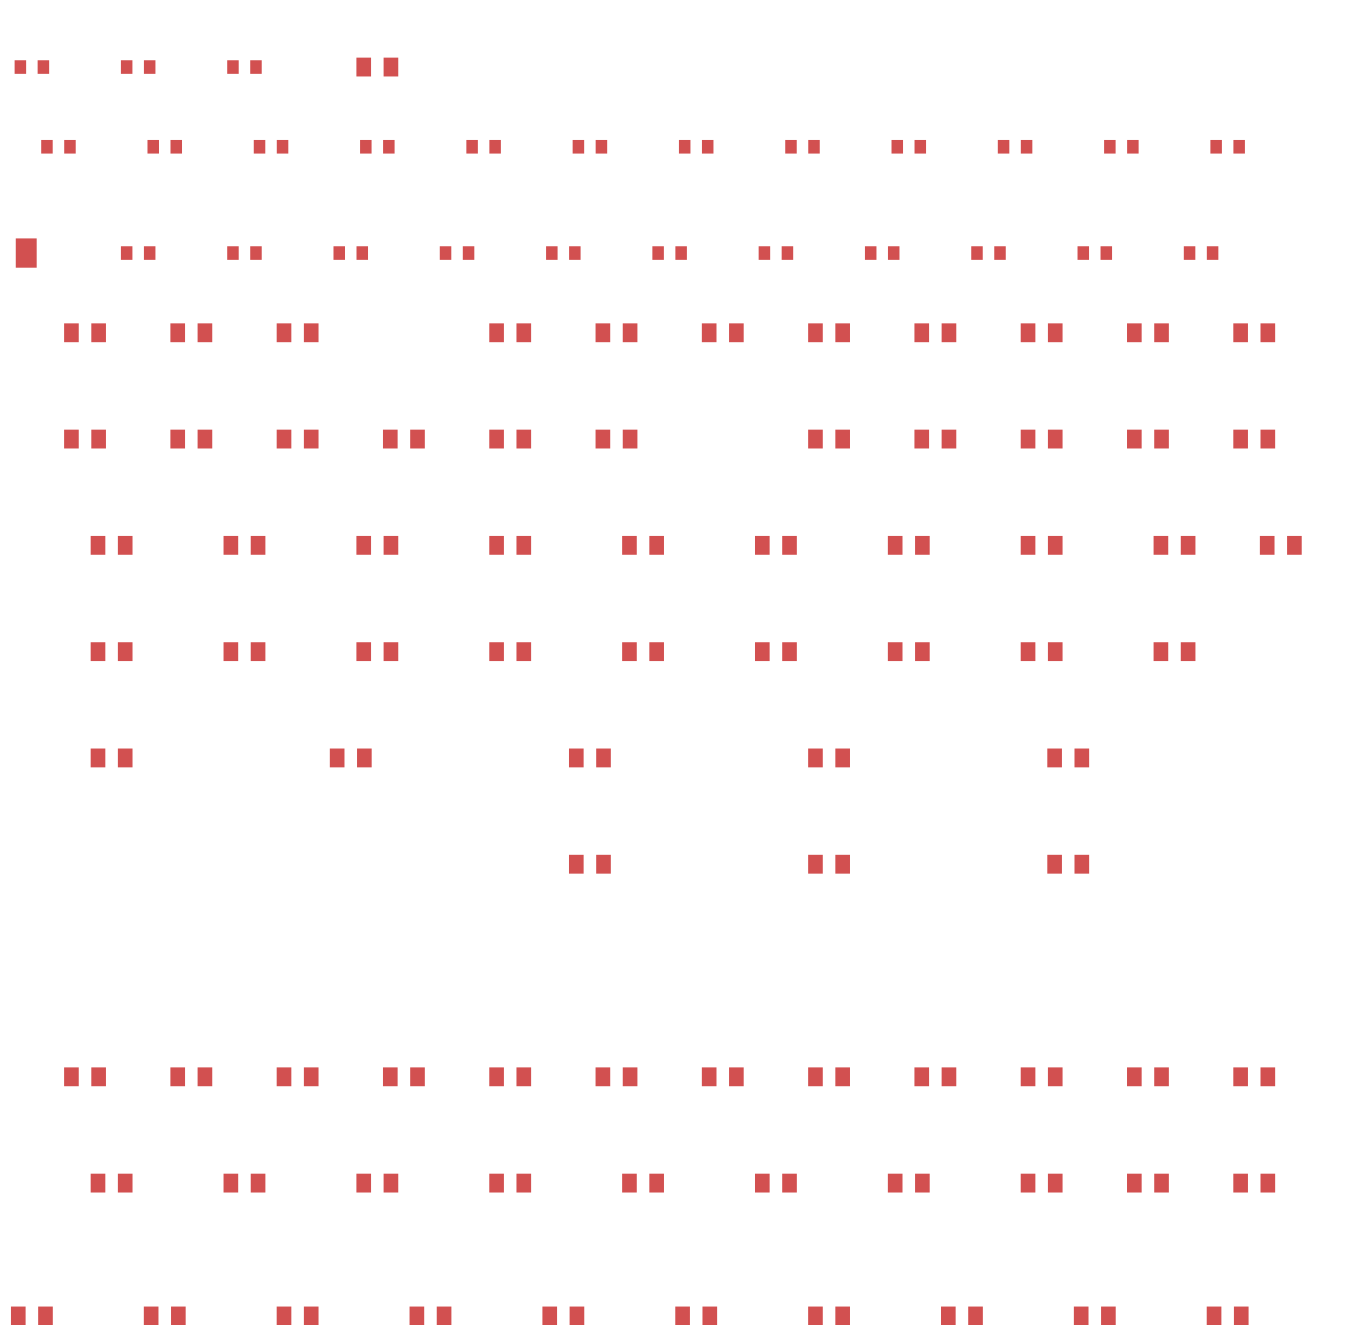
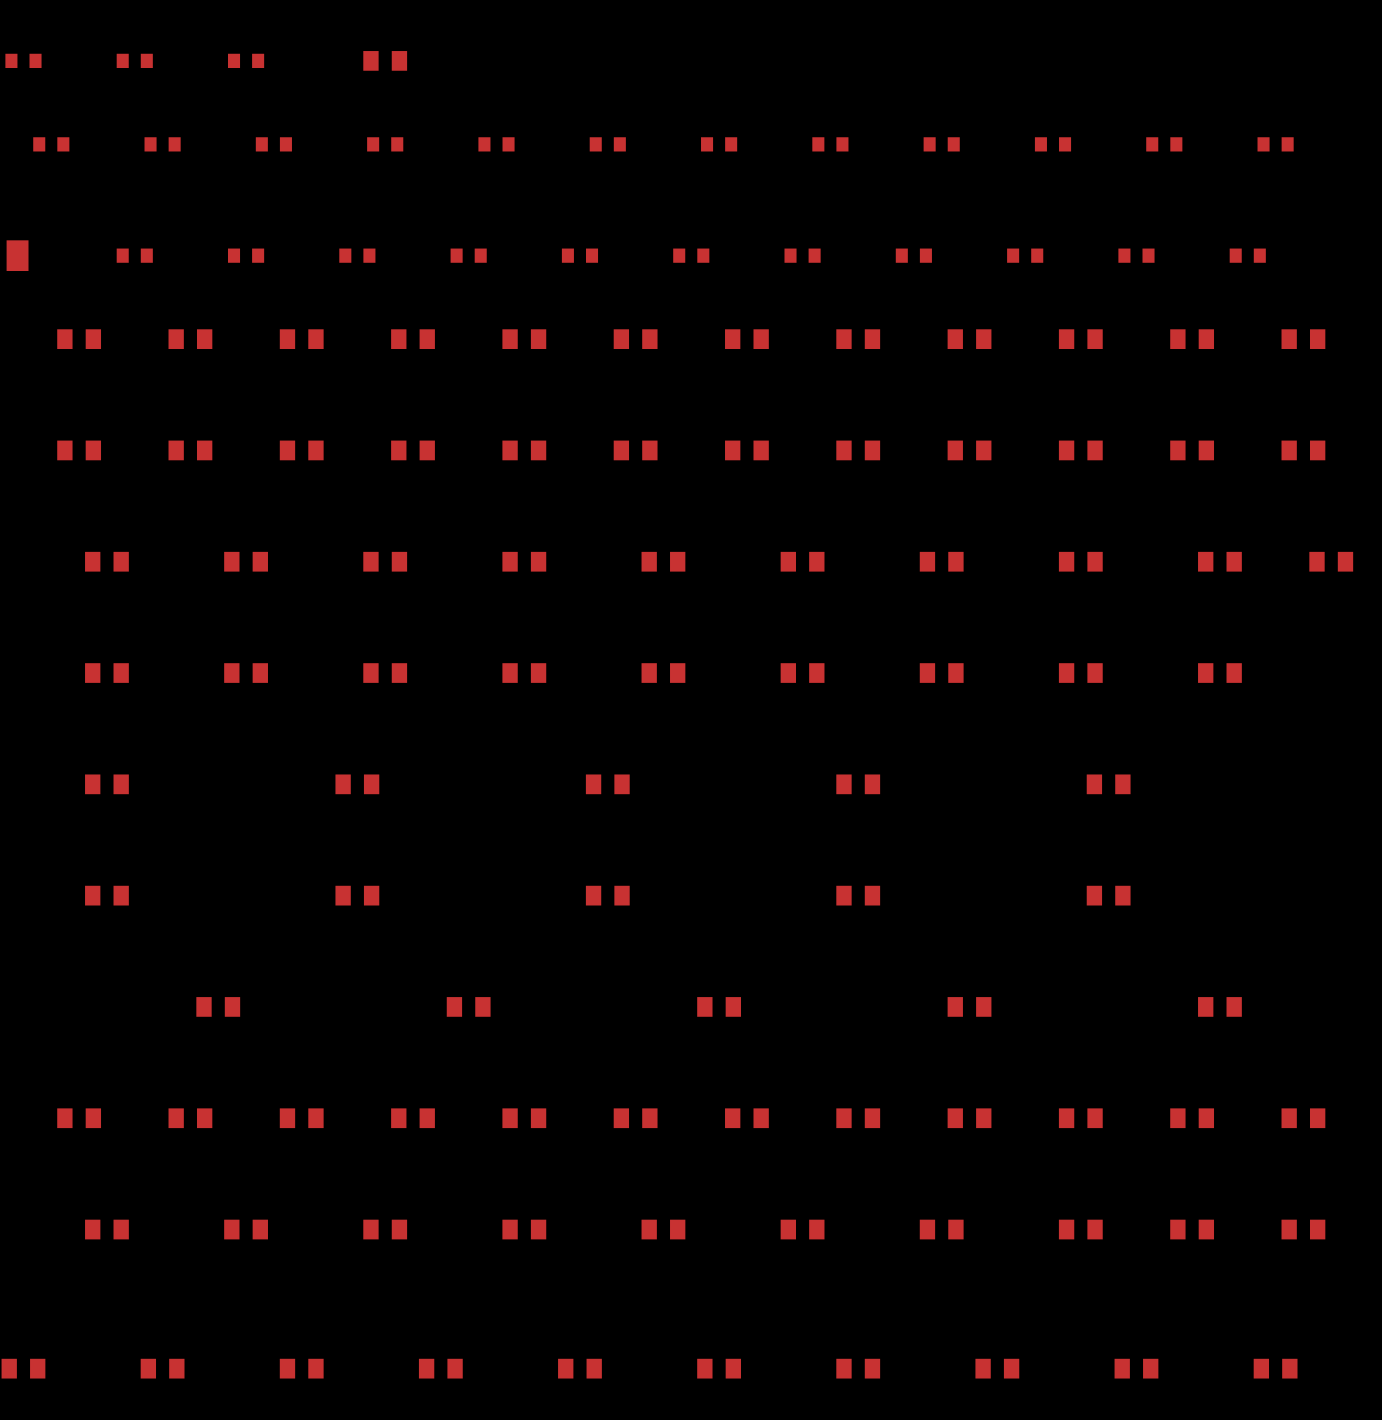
part: none -> (413, 339)
part: none -> (746, 450)
part: none -> (106, 895)
part: none -> (357, 895)
part: none -> (218, 1006)
part: none -> (468, 1006)
part: none -> (719, 1006)
part: none -> (969, 1006)
part: none -> (1219, 1006)

